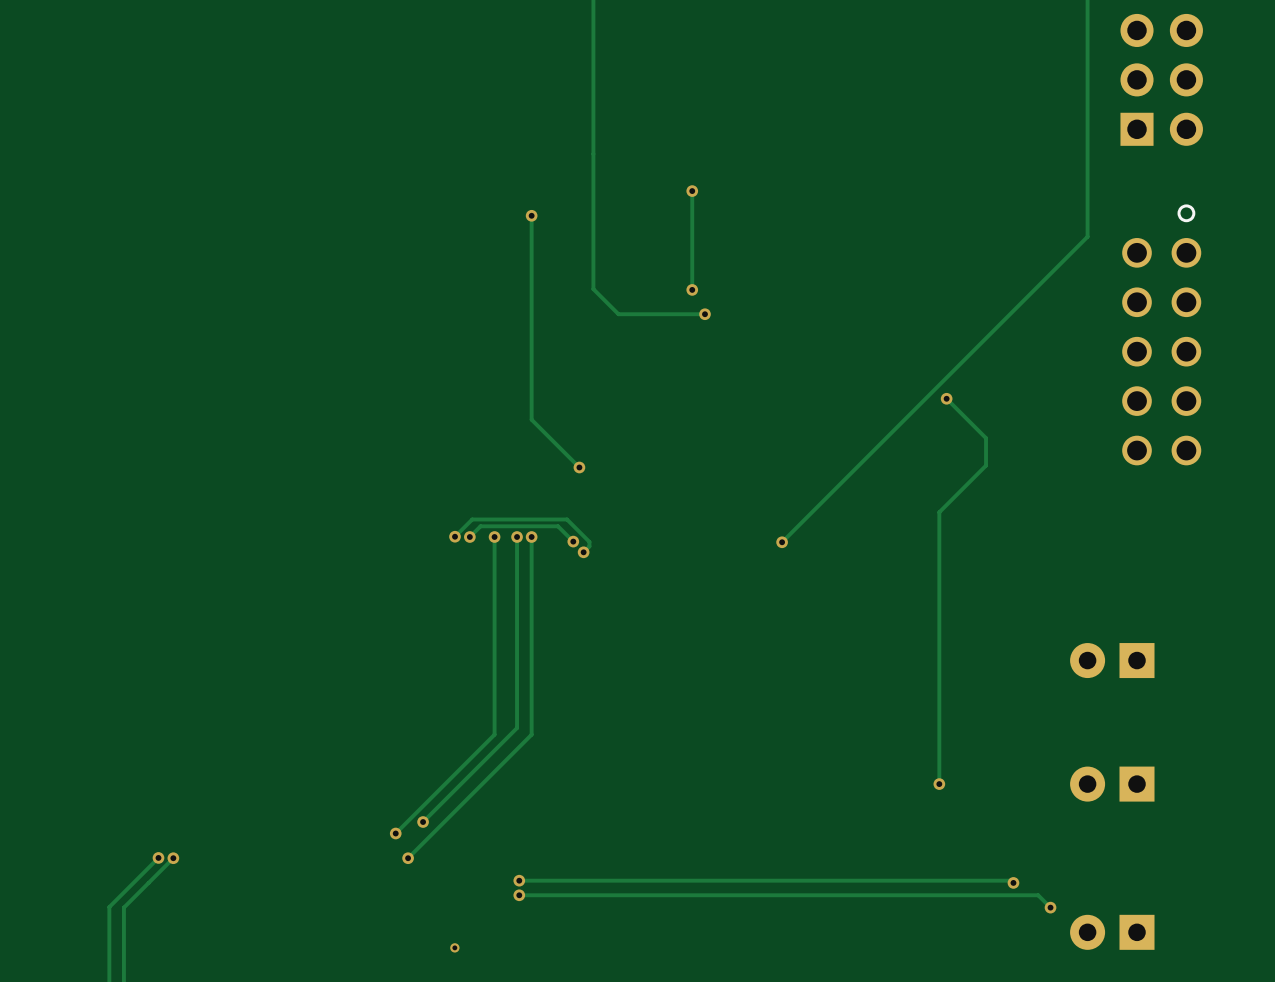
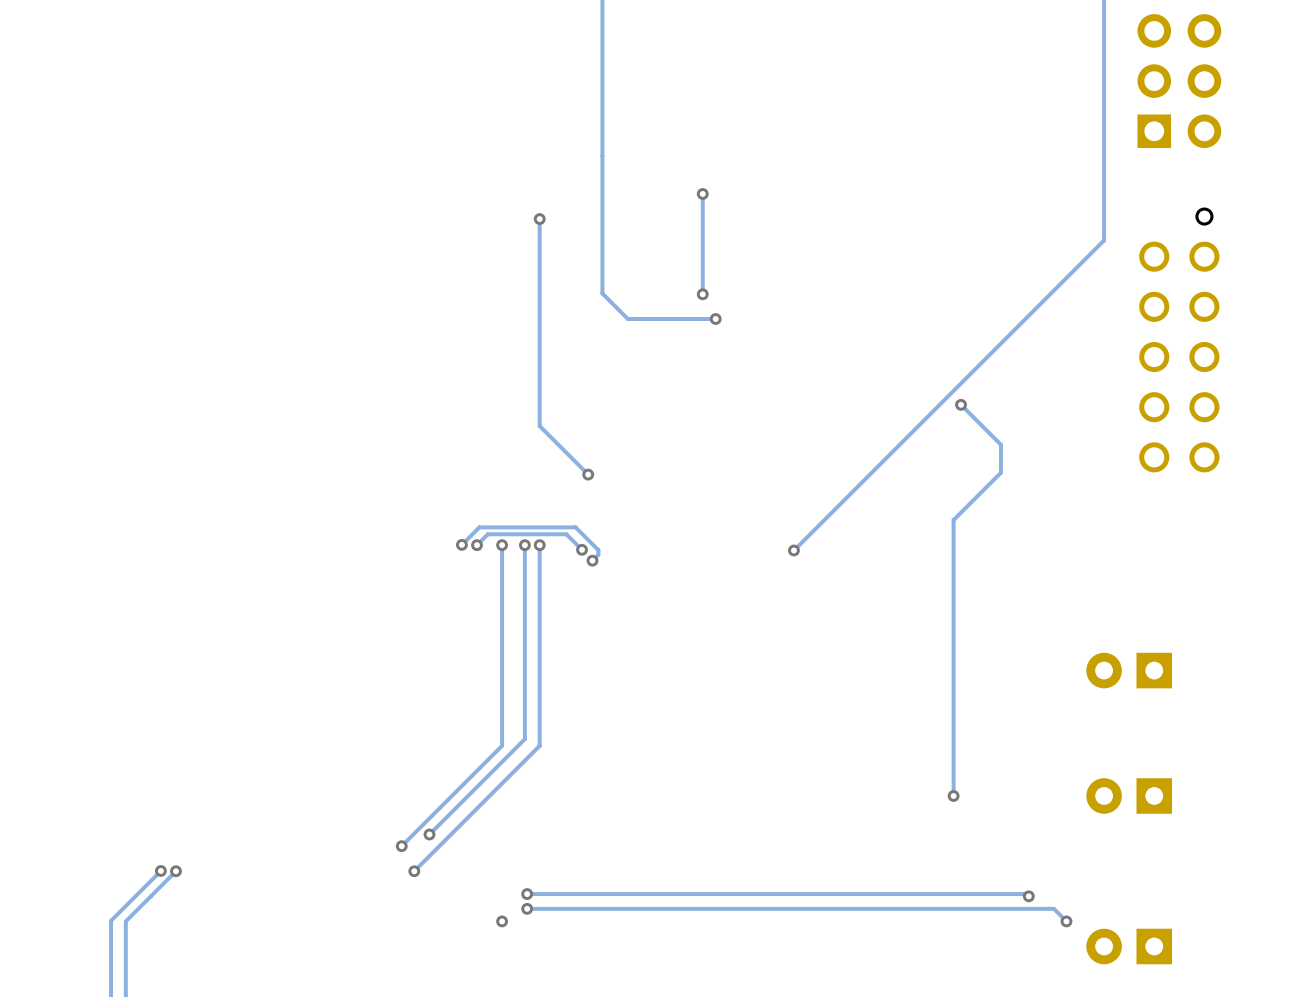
via: none -> (502, 921)
via: (454, 947) -> none

